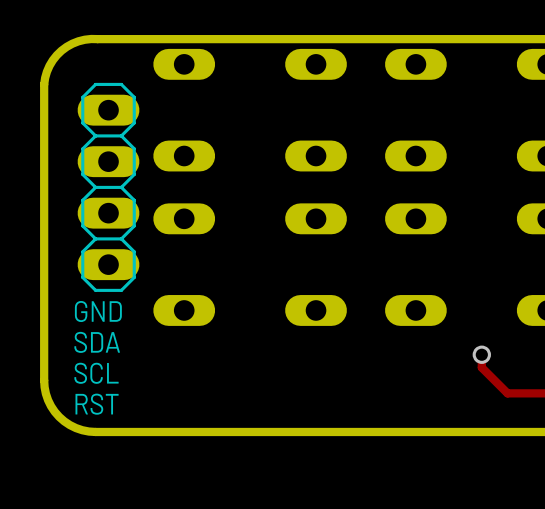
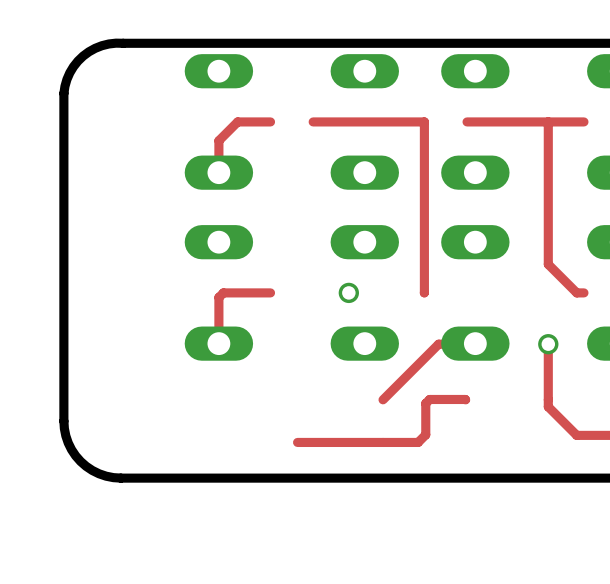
track: none -> (270, 121) (237, 121) (218, 140) (218, 172)
track: none -> (313, 121) (424, 121) (424, 292)
track: none -> (467, 121) (583, 121)
track: none -> (548, 121) (548, 264) (576, 292) (583, 292)
part: (108, 187) -> none
track: none -> (270, 292) (223, 292) (218, 297) (218, 343)
via: none -> (348, 292)
track: none -> (475, 343) (438, 344) (383, 399)
track: none -> (548, 344) (548, 392)
text: GND (98, 311) -> none
text: SDA (97, 342) -> none
via position: (481, 354) -> (548, 344)
track: none -> (465, 399) (429, 399) (425, 403) (425, 434) (418, 442) (297, 442)
text: SCL (96, 373) -> none
text: RST (97, 404) -> none

